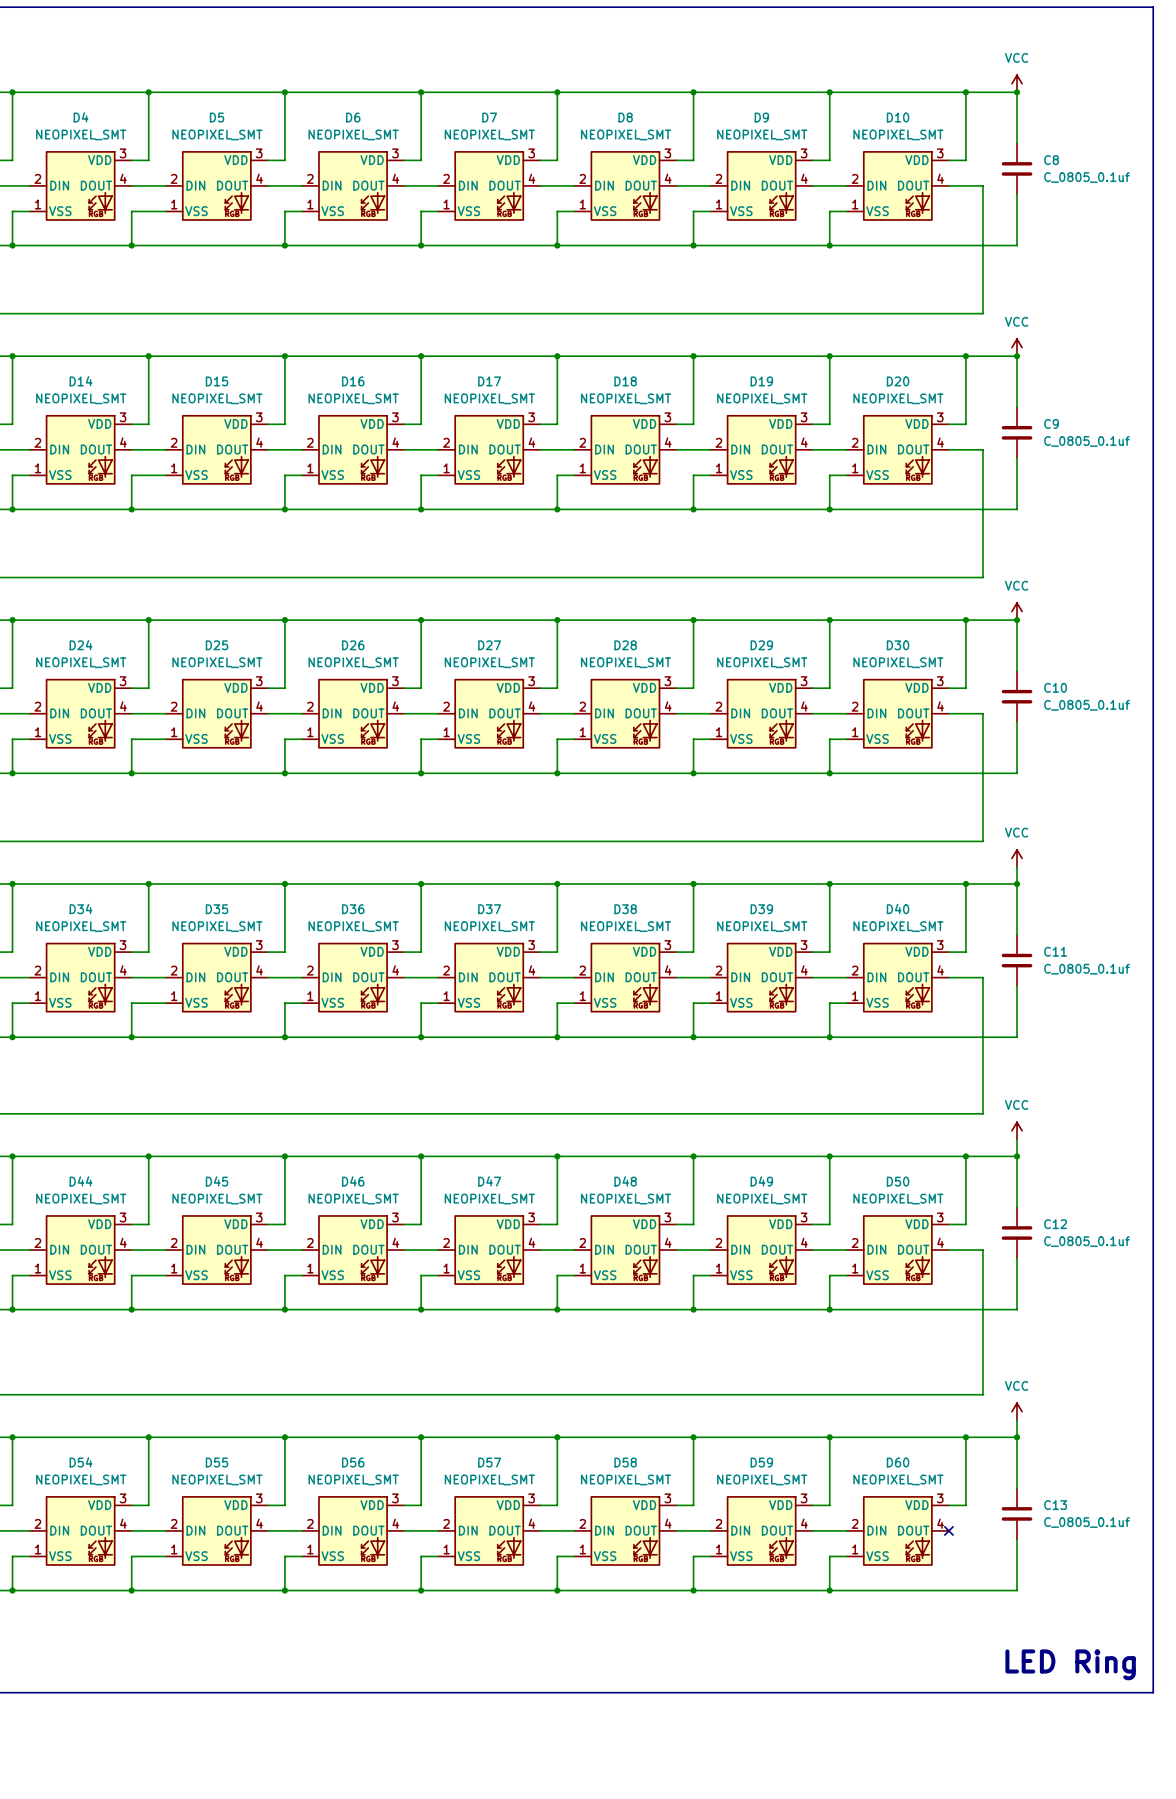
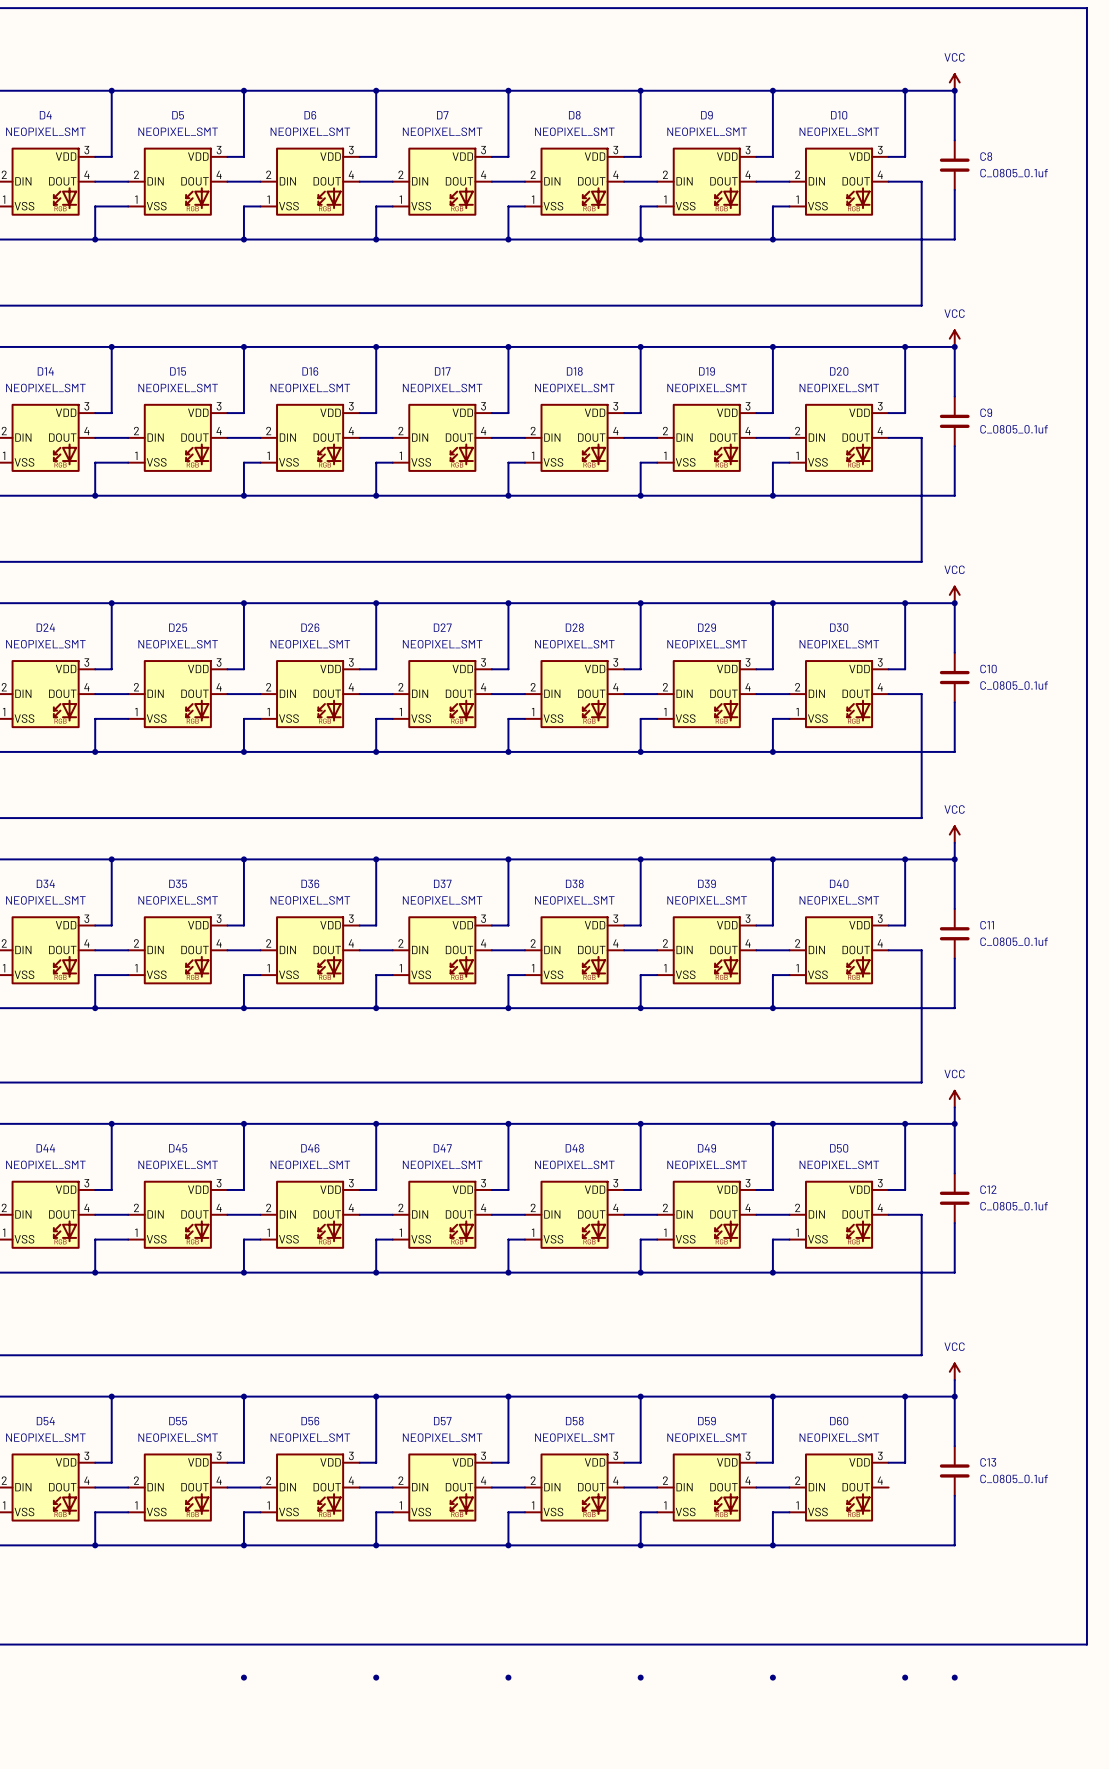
no-connect mark: (948, 1530) -> none
text: LED Ring (1070, 1664) -> none
junction: none -> (243, 1677)
junction: none -> (376, 1677)
junction: none -> (508, 1677)
junction: none -> (640, 1677)
junction: none -> (772, 1677)
junction: none -> (905, 1677)
junction: none -> (954, 1677)

